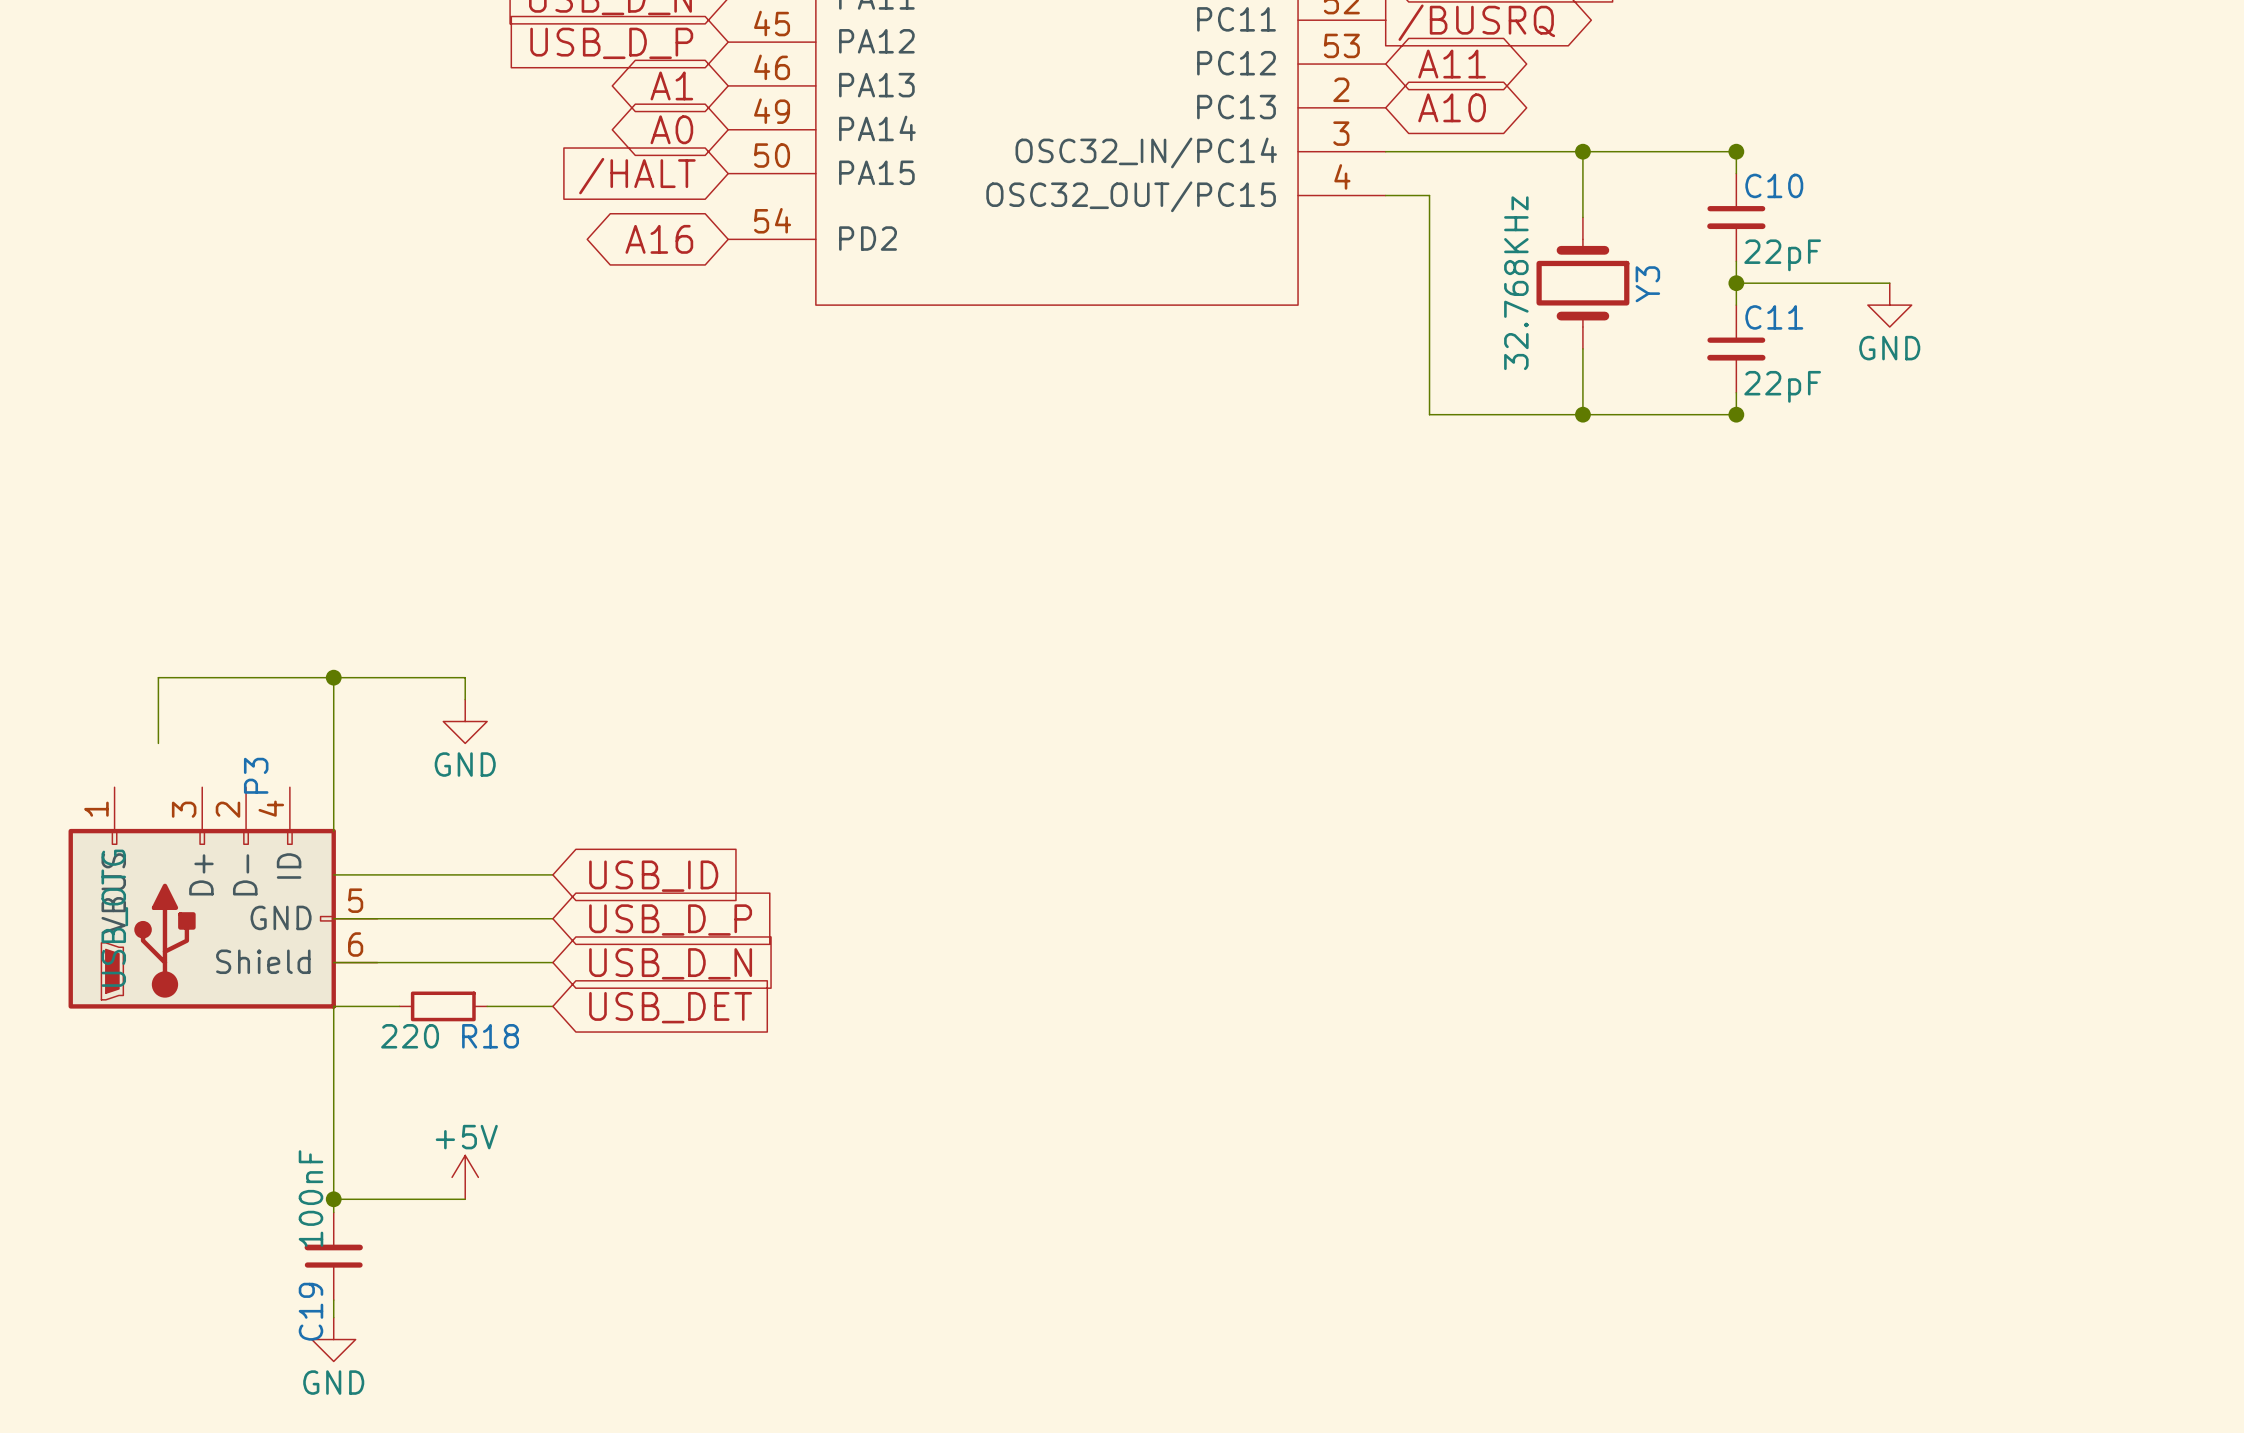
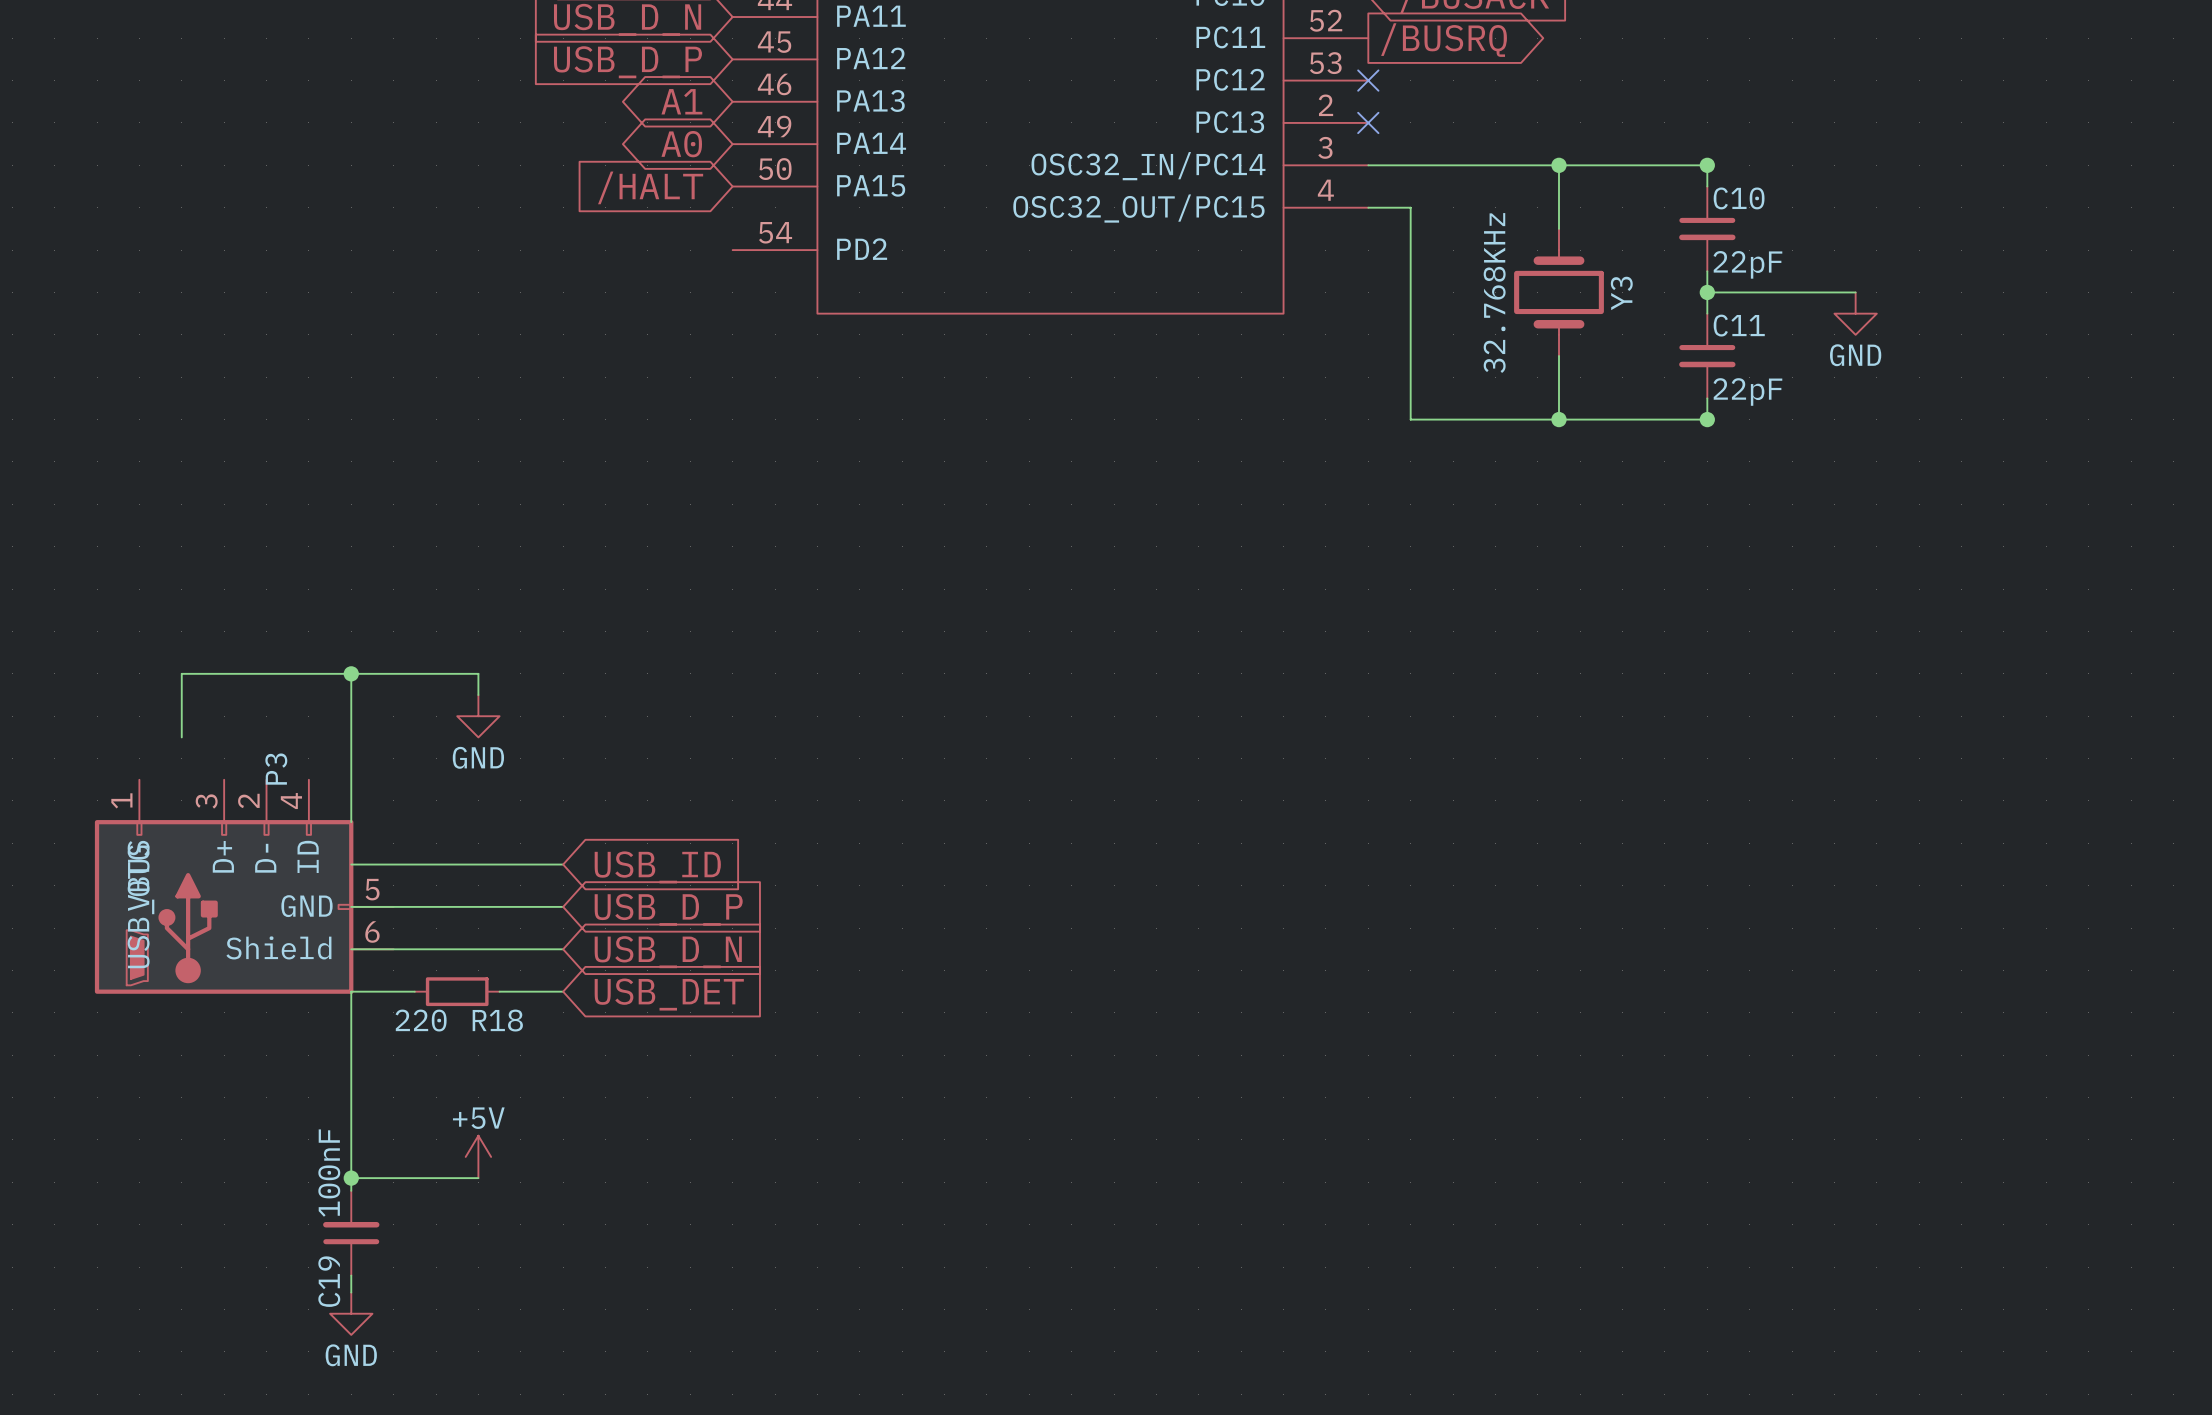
no-connect mark: none -> (1368, 80)
global label: A11 (1452, 64) -> none
no-connect mark: none -> (1368, 122)
global label: A10 (1452, 107) -> none
global label: A16 (659, 239) -> none

